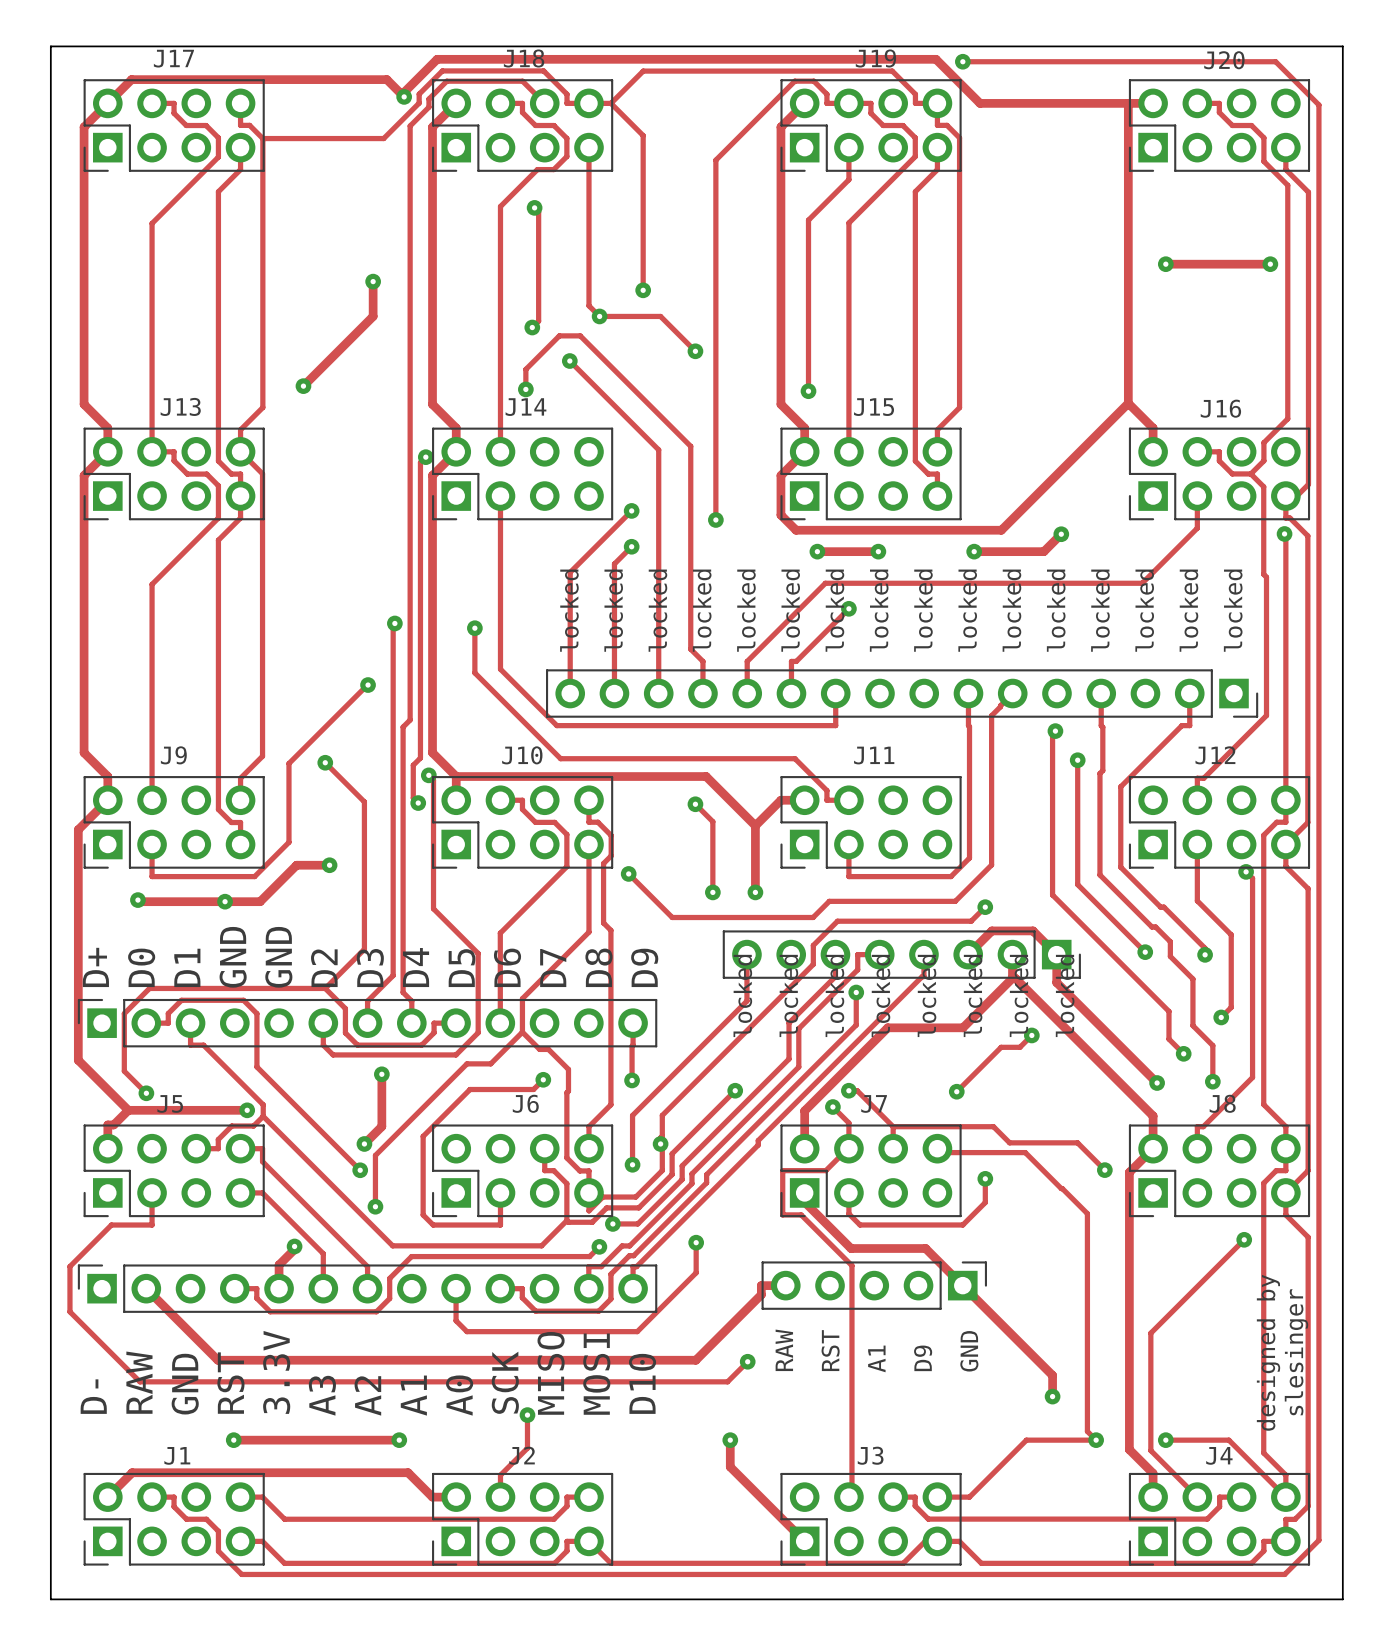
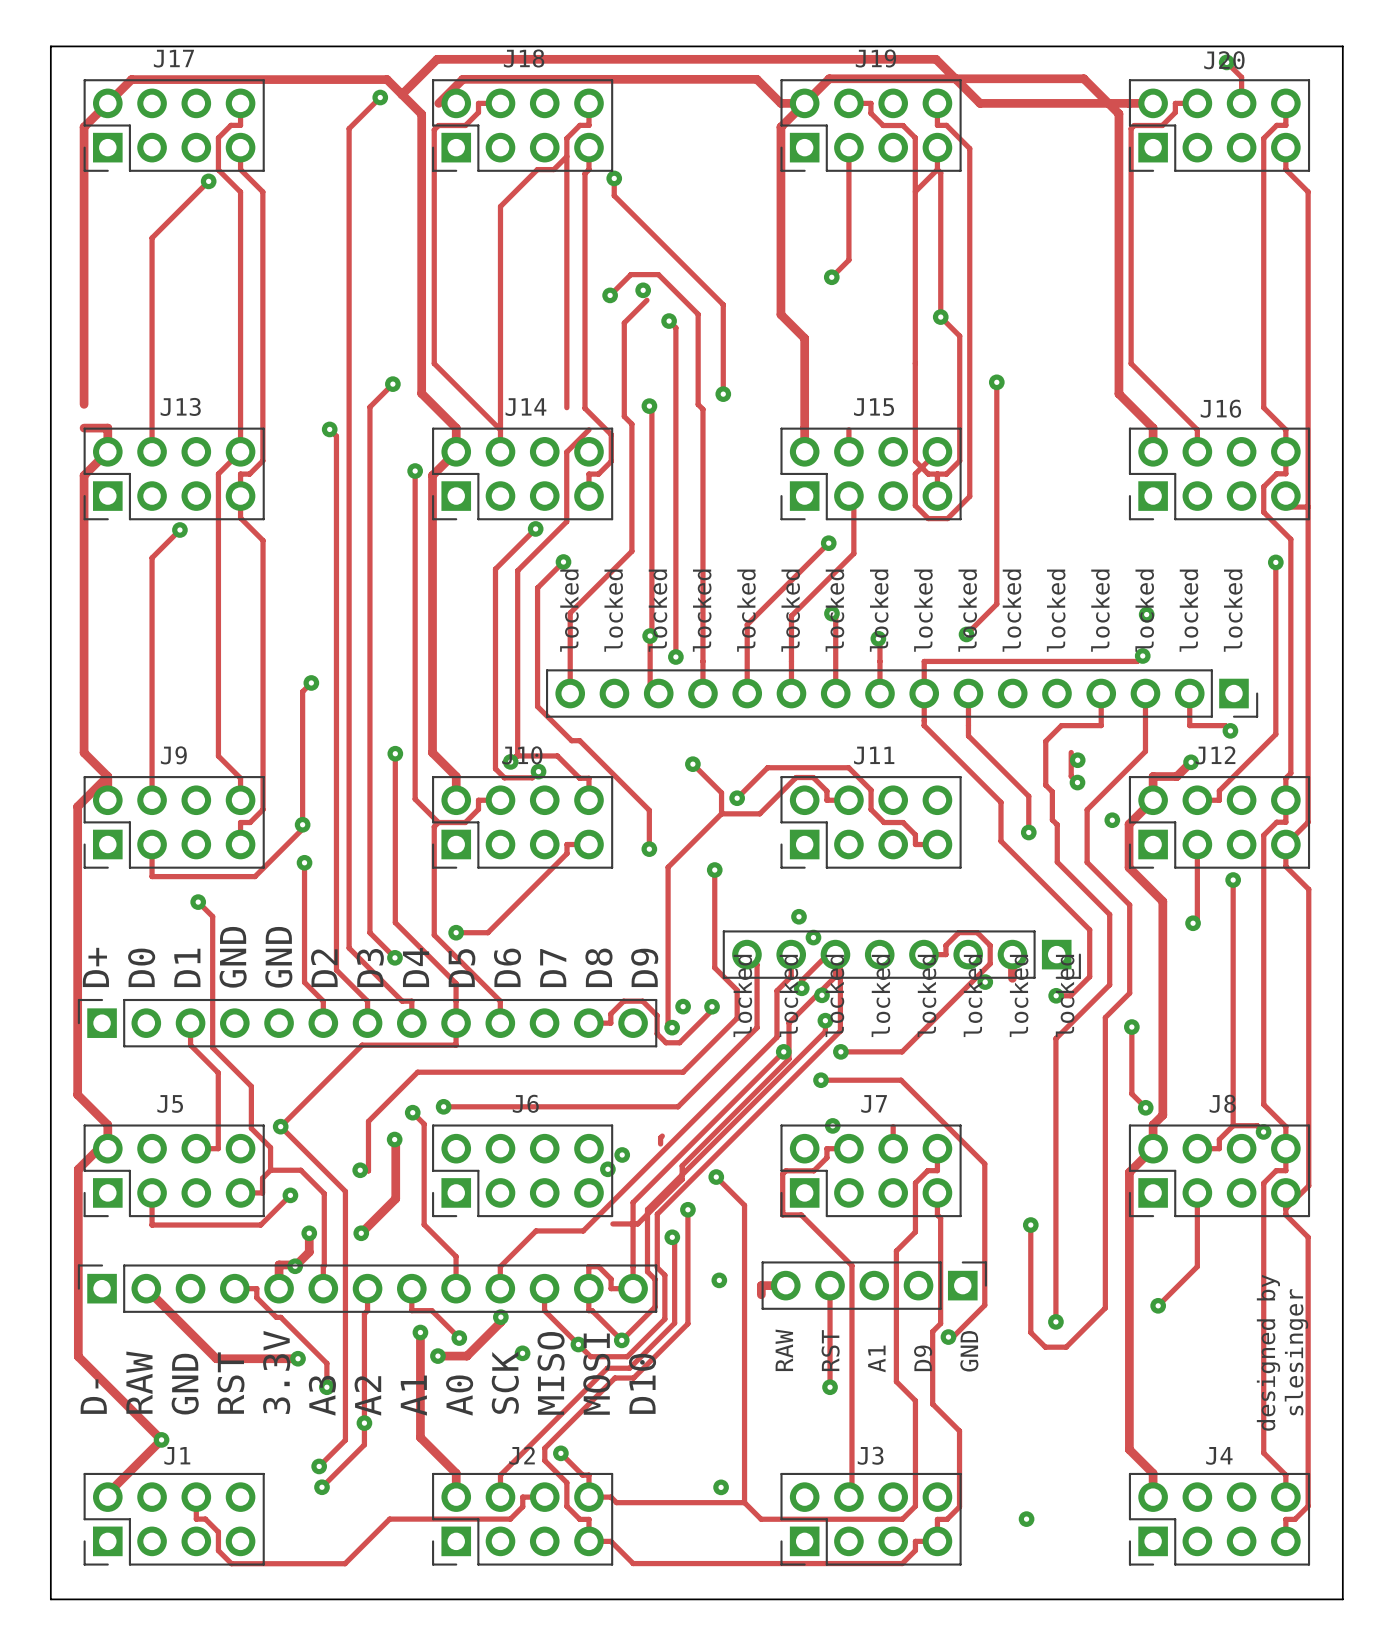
track: (962, 61) (1275, 61) (1318, 104) (1318, 1540) (1284, 1574) (241, 1574) (218, 1550) -> (544, 1497) (522, 1497) (522, 1506) (510, 1519) (389, 1519) (345, 1563) (231, 1563) (218, 1550)
via: (962, 61) -> none
track: none -> (1226, 62) (1241, 77) (1241, 103)
via: none -> (1226, 62)
track: (131, 79) (386, 79) (404, 96) -> (131, 79) (387, 79) (421, 114) (421, 393) (432, 404)
via position: (404, 96) -> (380, 97)
track: (152, 103) (174, 103) (174, 113) (186, 125) (206, 125) (218, 137) -> none
track: none -> (438, 103) (462, 79) (756, 79) (780, 103) (804, 103) (829, 78) (1083, 78) (1118, 113) (1118, 393) (1128, 403)
track: (456, 103) (432, 127) (432, 404) -> none
track: (500, 103) (522, 103) (522, 112) (535, 125) (553, 125) (566, 138) -> (588, 103) (588, 125) (579, 125) (566, 138)
track: none -> (500, 103) (478, 103) (478, 112) (465, 125) (438, 125) (434, 129) (434, 363) (500, 429)
track: (544, 103) (522, 81) (446, 81) (428, 99) (428, 107) (410, 126) (410, 720) (403, 727) (403, 992) (411, 1001) -> (380, 97) (349, 128) (349, 948) (402, 1001) (411, 1001)
track: (610, 103) (567, 103) (567, 94) (543, 70) (442, 70) (419, 94) (419, 103) (383, 138) (262, 138) -> none
track: (610, 103) (643, 135) (643, 290) -> none
track: (610, 103) (643, 71) (892, 71) (915, 94) (915, 103) (937, 103) -> none
track: (848, 103) (826, 103) (826, 94) (813, 81) (794, 81) (715, 160) (715, 519) -> none
track: (1128, 103) (1128, 403) (1001, 530) (796, 530) (780, 515) (780, 475) (804, 451) -> none
track: (1197, 103) (1219, 103) (1219, 112) (1232, 125) (1251, 125) (1263, 137) (1263, 161) (1287, 185) (1287, 418) (1263, 442) (1263, 460) (1250, 473) -> (1197, 103) (1175, 103) (1175, 112) (1162, 125) (1134, 125) (1131, 128) (1131, 363) (1197, 429) (1197, 451)
track: (240, 125) (249, 125) (262, 138) -> (240, 125) (230, 125) (218, 137)
track: (946, 125) (959, 137) (959, 407) (937, 429) (937, 451) -> (946, 125) (969, 148) (969, 496) (947, 518) (928, 518) (915, 505) (915, 473) (937, 451)
track: (262, 138) (262, 191) -> (240, 169) (262, 191)
track: (915, 156) (848, 222) -> (848, 179) (848, 222)
track: (218, 157) (152, 223) (152, 237) -> (208, 181) (152, 237)
track: none -> (218, 157) (218, 169) (240, 192) (240, 429)
track: (240, 169) (218, 191) (218, 461) (231, 474) (240, 474) -> none
track: (588, 169) (588, 305) (599, 316) (660, 316) (695, 351) -> (588, 169) (584, 173) (584, 408) (611, 434) (611, 461) (598, 474) (588, 474) (588, 496)
track: none -> (937, 169) (940, 172) (940, 317) (959, 336) (959, 460) (946, 474) (937, 474)
track: none -> (614, 178) (614, 195) (723, 304) (723, 394)
via: none -> (614, 178)
track: (848, 179) (808, 220) (808, 391) -> none
via: none -> (208, 181)
track: (1308, 191) (1308, 484) (1285, 507) (1285, 518) (1289, 518) (1307, 535) (1307, 822) -> (1308, 191) (1307, 822)
track: (534, 207) (538, 211) (538, 321) (532, 327) -> none
via: (534, 207) -> none
track: (848, 260) (848, 429) -> (848, 260) (831, 277)
track: (1165, 264) (1270, 264) -> none
via: (1165, 264) -> none
via: (1270, 264) -> none
via: none -> (831, 277)
track: (373, 281) (373, 316) (303, 386) -> none
via: (373, 281) -> none
track: (780, 314) (780, 404) (804, 428) -> (780, 314) (804, 338) (804, 428)
via position: (599, 316) -> (610, 295)
via: none -> (940, 317)
track: none -> (669, 321) (675, 327) (675, 657)
via: none -> (669, 321)
via: (532, 327) -> none
via: (695, 351) -> none
track: (569, 361) (658, 449) (658, 693) -> (649, 406) (651, 408) (650, 684) (658, 693)
via: (569, 361) -> none
track: none -> (996, 382) (996, 604) (966, 634)
via: none -> (996, 382)
track: none -> (392, 384) (369, 407) (369, 932) (394, 957)
via: none -> (392, 384)
via: (303, 386) -> none
track: (525, 389) (525, 369) (559, 335) (580, 335) (690, 446) (690, 649) (702, 661) -> (610, 295) (630, 274) (658, 274) (698, 314) (698, 404) (702, 409) (702, 661)
via: (525, 389) -> none
via: (808, 391) -> none
via: none -> (723, 394)
track: (84, 404) (107, 428) -> (84, 428) (107, 428)
via: none -> (649, 406)
track: (262, 407) (240, 429) -> (262, 407) (262, 460) (249, 474) (240, 474)
via: none -> (329, 429)
track: none -> (588, 429) (566, 452) (566, 521) (517, 570) (517, 755)
track: (152, 451) (174, 451) (174, 460) (187, 474) (206, 474) (218, 485) -> (240, 451) (218, 473) (218, 485)
track: (240, 451) (262, 473) (262, 756) (240, 778) -> none
track: (1197, 451) (1219, 451) (1219, 460) (1232, 473) (1250, 473) -> none
track: (425, 457) (420, 462) (420, 758) (413, 765) (413, 798) (418, 803) -> none
via position: (425, 457) -> (415, 471)
track: none -> (415, 471) (415, 799) (438, 822)
track: (1250, 473) (1263, 486) -> (1285, 103) (1285, 125) (1276, 125) (1263, 138) (1263, 407) (1285, 429) (1285, 473) (1276, 473) (1263, 486)
track: (500, 496) (500, 669) (556, 725) (835, 725) (835, 693) -> (831, 613) (835, 617) (835, 693)
track: (1197, 496) (1197, 528) (1142, 583) (825, 583) (747, 661) -> (828, 543) (747, 624) (747, 661)
track: none -> (1285, 507) (1308, 507)
track: (631, 510) (570, 572) (570, 613) -> (646, 300) (624, 322) (624, 416) (631, 424) (631, 551) (570, 613)
via: (631, 510) -> none
track: (1263, 512) (1263, 574) (1266, 577) (1266, 715) (1203, 778) (1197, 778) (1197, 800) -> (1275, 562) (1275, 734) (1219, 790) (1219, 800) (1197, 800)
track: (218, 518) (152, 584) -> (179, 530) (152, 557) (152, 584)
track: (240, 518) (218, 540) -> (218, 518) (218, 540)
track: none -> (240, 518) (263, 540) (263, 809) (250, 822) (240, 822)
via: (715, 519) -> none
track: none -> (535, 528) (495, 569) (495, 768) (504, 777) (532, 777) (538, 771)
via: none -> (535, 528)
via: none -> (179, 530)
track: (1284, 533) (1285, 778) -> (1263, 512) (1290, 539) (1290, 773) (1285, 778)
via position: (1284, 533) -> (1275, 562)
track: (1061, 534) (1043, 551) (974, 551) -> none
via: (1061, 534) -> none
track: (631, 546) (614, 563) (614, 693) -> none
via: (631, 546) -> none
track: (817, 551) (878, 551) -> none
via position: (817, 551) -> (828, 543)
via: (878, 551) -> none
via: (974, 551) -> none
track: none -> (563, 562) (537, 587) (537, 706) (571, 740) (579, 740) (649, 810) (649, 849)
via: none -> (563, 562)
track: (848, 608) (796, 661) (791, 661) -> (848, 496) (853, 501) (853, 553) (791, 615) (791, 661)
via position: (848, 608) -> (831, 613)
via: none -> (1146, 614)
track: (394, 623) (393, 625) (393, 975) (367, 1001) -> (329, 429) (336, 436) (336, 970) (367, 1001)
via: (394, 623) -> none
track: (474, 628) (474, 672) (560, 758) (795, 758) (826, 791) -> (721, 813) (759, 813) (796, 777) (813, 777) (826, 791)
via: (474, 628) -> none
via: none -> (966, 634)
via: none -> (650, 636)
track: none -> (878, 638) (879, 640) (879, 693)
via: none -> (878, 638)
track: none -> (1142, 655) (1137, 661) (924, 661) (924, 725) (1000, 802) (1000, 841) (1089, 929) (1089, 976) (1070, 995) (1056, 995)
via: none -> (1142, 655)
via: none -> (675, 657)
via: none -> (311, 682)
track: (368, 685) (288, 763) (288, 842) (254, 876) -> (311, 682) (302, 691) (302, 829) (255, 876)
via: (368, 685) -> none
track: (1012, 693) (991, 715) (991, 865) (955, 901) (829, 901) (813, 917) (672, 917) (628, 873) -> none
track: none -> (1145, 693) (1145, 751) (1087, 809) (1087, 862) (1129, 904) (1129, 993) (1105, 1017) (1105, 1308) (1066, 1347) (1045, 1347) (1030, 1332) (1030, 1225)
track: (968, 725) (969, 858) (951, 876) (848, 876) (848, 844) -> (968, 725) (968, 736) (1028, 796) (1028, 832)
track: (1101, 725) (1102, 727) (1102, 770) (1099, 773) (1099, 875) (1151, 927) (1155, 927) (1170, 941) (1170, 956) (1192, 979) (1192, 1025) (1212, 1045) (1212, 1081) -> (1101, 725) (1061, 725) (1045, 741) (1045, 785) (1052, 791) (1052, 819) (1057, 824) (1057, 862) (1109, 914) (1109, 984) (1055, 1038) (1055, 1321)
track: (1189, 725) (1181, 725) (1120, 786) (1120, 867) (1205, 948) (1205, 954) -> (1189, 725) (1225, 725) (1230, 730)
via: none -> (1230, 730)
track: (1055, 731) (1052, 733) (1052, 895) (1168, 1011) (1168, 1039) (1183, 1053) -> none
via: (1055, 731) -> none
track: none -> (1071, 752) (1071, 776) (1077, 782)
via: none -> (395, 753)
track: (218, 756) (218, 809) (231, 822) (240, 822) -> (218, 756) (240, 778)
track: (1077, 760) (1077, 884) (1145, 952) -> none
via: none -> (510, 761)
track: (325, 762) (364, 801) (364, 949) (325, 988) -> none
via: (325, 762) -> none
via: none -> (1191, 762)
track: none -> (692, 764) (721, 792) (721, 813)
via: none -> (692, 764)
via: none -> (538, 771)
track: (428, 775) (433, 780) (433, 908) (478, 953) (478, 1032) (456, 1054) (333, 1054) (323, 1045) (323, 1023) -> (304, 862) (304, 982) (323, 1001) (323, 1023)
via: (428, 775) -> none
track: (456, 776) (706, 776) (755, 825) -> none
via: none -> (1077, 782)
track: none -> (737, 798) (767, 767) (848, 767) (871, 790) (871, 809) (884, 822) (903, 822) (915, 834) (915, 844) (937, 844)
via: none -> (737, 798)
track: (107, 800) (78, 829) (78, 1060) (128, 1110) -> none
track: (500, 800) (522, 800) (522, 809) (535, 822) (554, 822) (566, 834) (566, 866) (500, 933) (500, 1001) -> (438, 822) (434, 826) (434, 935) (500, 1001)
track: none -> (500, 800) (478, 800) (478, 809) (465, 822) (438, 822)
track: (588, 800) (588, 822) (597, 822) (611, 835) (611, 855) (603, 863) (603, 923) (610, 930) (610, 1104) (588, 1126) (588, 1148) -> (588, 800) (588, 778) (579, 778) (557, 755) (516, 755) (510, 761)
track: (804, 800) (780, 800) (755, 825) -> none
via: (418, 803) -> none
track: (695, 804) (712, 821) (712, 892) -> none
via: (695, 804) -> none
track: none -> (721, 813) (668, 867) (668, 1023) (672, 1027)
via: none -> (1112, 820)
via: none -> (302, 824)
track: (755, 825) (755, 892) -> none
via: none -> (1028, 832)
track: (588, 844) (588, 932) (522, 998) (522, 1032) -> (588, 844) (567, 844) (567, 853) (487, 932) (456, 932)
via: none -> (649, 849)
via: none -> (304, 862)
track: (329, 865) (296, 865) (260, 901) (139, 901) (137, 900) (139, 900) -> none
via: (329, 865) -> none
track: none -> (714, 870) (714, 967) (737, 990) (737, 1018) (683, 1072) (417, 1072) (368, 1121) (368, 1170)
track: (1246, 871) (1252, 878) (1252, 1077) (1203, 1126) (1197, 1126) (1197, 1148) -> (1233, 1125) (1219, 1139) (1219, 1148) (1197, 1148)
via position: (1246, 871) -> (1233, 880)
via: (628, 873) -> none
track: none -> (1233, 880) (1233, 1125)
track: (1308, 888) (1308, 1170) (1285, 1192) -> (1308, 888) (1308, 1185) (1285, 1208)
via position: (712, 892) -> (714, 870)
via: (755, 892) -> none
via: (137, 900) -> none
track: (1197, 900) (1231, 934) (1231, 1007) (1221, 1017) -> (1197, 900) (1197, 918) (1193, 923)
via position: (225, 901) -> (198, 902)
track: none -> (198, 902) (212, 916) (212, 1047) (251, 1086) (251, 1128) (270, 1147) (270, 1170)
track: (985, 907) (971, 921) (837, 921) (813, 945) (813, 964) (662, 1115) (662, 1170) (635, 1197) (602, 1197) (588, 1210) (588, 1170) (579, 1170) (566, 1157) (568, 1069) (548, 1049) (539, 1049) (522, 1032) -> none
via: (985, 907) -> none
via: none -> (798, 916)
via: none -> (1193, 923)
via: none -> (456, 932)
via: none -> (813, 937)
via: (1145, 952) -> none
track: (746, 954) (746, 1001) (632, 1115) (632, 1164) -> (746, 954) (757, 964) (757, 1027) (678, 1106) (443, 1106)
track: none -> (827, 954) (801, 980) (801, 988)
track: none -> (834, 954) (840, 960) (840, 1031) (657, 1214) (657, 1267) (664, 1275) (664, 1319) (627, 1356) (590, 1356) (544, 1310) (544, 1288)
track: (879, 954) (857, 954) (857, 969) (798, 1028) (798, 1067) (691, 1173) (691, 1183) (629, 1245) (622, 1245) (601, 1266) (598, 1266) -> (633, 1288) (611, 1288) (611, 1279) (598, 1266)
track: (923, 954) (923, 976) (758, 1140) (758, 1145) (636, 1266) (633, 1266) -> (783, 1051) (633, 1202) (633, 1266)
track: none -> (923, 954) (945, 954) (945, 945) (958, 932) (977, 932) (990, 945) (990, 963) (902, 1051) (840, 1051)
track: (968, 954) (991, 930) (1033, 930) (1056, 954) (1056, 982) (1157, 1083) -> none
via: (1205, 954) -> none
via: none -> (394, 957)
via: none -> (985, 982)
track: (325, 988) (345, 1008) (345, 1032) (357, 1045) (362, 1045) -> (319, 1466) (345, 1440) (345, 1191) (280, 1126) (362, 1045)
track: (325, 988) (149, 988) (124, 1013) (124, 1071) (146, 1093) -> none
via: none -> (801, 988)
track: (856, 992) (856, 1025) (706, 1174) (706, 1182) (633, 1255) (629, 1255) (610, 1274) (610, 1299) (598, 1311) (535, 1311) (522, 1297) (522, 1288) (500, 1288) -> (791, 954) (791, 976) (776, 990) (776, 1037) (583, 1230) (536, 1230) (500, 1266) (500, 1288)
via: (856, 992) -> none
via: none -> (822, 995)
via: none -> (1056, 995)
via: none -> (683, 1006)
track: none -> (712, 1006) (712, 1010) (679, 1042) (666, 1042) (657, 1033) (657, 1015) (642, 1001) (623, 1001) (610, 1014) (610, 1023) (588, 1023)
via: none -> (712, 1006)
via: (1221, 1017) -> none
track: none -> (825, 1020) (825, 1031) (647, 1209) (647, 1271) (655, 1279) (655, 1307) (621, 1340) (592, 1310) (588, 1310) (588, 1288)
via: none -> (825, 1020)
track: (146, 1023) (168, 1023) (168, 1013) (181, 1000) (243, 1000) (256, 1013) (256, 1066) (360, 1170) -> none
track: (456, 1023) (434, 1023) (434, 1032) (421, 1045) -> (395, 753) (395, 922) (456, 983) (456, 1045) (421, 1045)
track: (633, 1023) (632, 1080) -> none
via: none -> (672, 1027)
track: none -> (1131, 1027) (1131, 1093) (1145, 1107)
via: none -> (1131, 1027)
track: (522, 1032) (490, 1063) (466, 1063) (375, 1155) (375, 1206) -> none
track: (1031, 1035) (1019, 1047) (1001, 1047) (956, 1091) -> none
via: (1031, 1035) -> none
track: (190, 1045) (203, 1045) (263, 1104) (263, 1116) -> (190, 1045) (218, 1072) (218, 1139)
via: none -> (783, 1051)
via: none -> (840, 1051)
via: (1183, 1053) -> none
track: (381, 1074) (381, 1126) (364, 1143) -> none
via: (381, 1074) -> none
track: (543, 1079) (533, 1089) (470, 1089) (423, 1136) (423, 1214) (433, 1225) (500, 1225) (500, 1192) -> none
via: (543, 1079) -> none
via: (632, 1080) -> none
track: none -> (821, 1080) (901, 1080) (984, 1163) (984, 1305) (953, 1337) (948, 1337)
via: none -> (821, 1080)
via: (1212, 1081) -> none
via position: (1157, 1083) -> (1145, 1107)
track: (735, 1090) (672, 1153) (672, 1174) (638, 1207) (606, 1207) (592, 1222) (568, 1222) (566, 1220) -> none
via: (735, 1090) -> none
track: (848, 1090) (857, 1090) (893, 1126) (993, 1126) (1009, 1142) (1077, 1142) (1104, 1170) -> none
via: (848, 1090) -> none
via: (956, 1091) -> none
via: (146, 1093) -> none
via: none -> (443, 1106)
track: (832, 1107) (848, 1123) (848, 1148) -> none
via: (832, 1107) -> none
track: (128, 1110) (113, 1124) (107, 1124) -> (107, 776) (77, 806) (77, 1094) (107, 1124)
track: (128, 1110) (247, 1110) -> none
via position: (247, 1110) -> (280, 1126)
via: none -> (412, 1112)
track: (263, 1116) (392, 1245) (541, 1245) (566, 1220) -> none
track: (263, 1116) (253, 1126) (231, 1126) (218, 1139) -> none
track: (1153, 1124) (1153, 1116) (1015, 978) (1012, 978) (962, 1027) (887, 1027) (804, 1110) (804, 1148) -> (1153, 1124) (1162, 1115) (1162, 901) (1129, 867) (1129, 824) (1153, 800) (1153, 776) (1176, 776) (1191, 762)
via: none -> (832, 1125)
track: none -> (1233, 1125) (1257, 1125) (1263, 1131)
via: none -> (1263, 1131)
track: none -> (107, 1139) (78, 1169) (78, 1356) (161, 1439) (107, 1493) (107, 1497)
track: none -> (394, 1139) (395, 1198) (361, 1233)
via: none -> (394, 1139)
via: (364, 1143) -> none
via: (660, 1143) -> none
track: (240, 1148) (262, 1148) (262, 1161) (367, 1266) (367, 1288) -> (322, 1487) (364, 1444) (364, 1313) (367, 1310) (367, 1288)
track: (544, 1148) (544, 1170) (553, 1170) (566, 1183) (566, 1220) -> none
track: (847, 1148) (825, 1170) (783, 1170) (782, 1173) -> (847, 1148) (826, 1148) (826, 1157) (813, 1170) (785, 1170) (782, 1173)
track: (937, 1148) (941, 1152) (1025, 1152) (1087, 1213) (1087, 1431) (1096, 1440) (1026, 1440) (969, 1497) (937, 1497) -> (937, 1148) (937, 1170) (927, 1170) (915, 1183) (915, 1231) (896, 1251) (896, 1381) (915, 1400) (915, 1506) (902, 1519) (761, 1519) (744, 1502)
via position: (632, 1164) -> (622, 1154)
via: none -> (607, 1169)
track: none -> (270, 1170) (262, 1178) (262, 1192)
via: (1104, 1170) -> none
track: none -> (716, 1177) (744, 1205) (744, 1502)
via: none -> (716, 1177)
track: (985, 1178) (985, 1202) (962, 1224) (860, 1224) (848, 1213) (848, 1192) -> none
via: (985, 1178) -> none
track: (262, 1192) (323, 1253) (323, 1266) -> (270, 1170) (300, 1170) (324, 1193) (323, 1266)
track: (804, 1192) (804, 1202) (851, 1248) (925, 1248) (1052, 1375) (1052, 1396) -> none
track: none -> (1197, 1192) (1197, 1266) (1158, 1305)
via: none -> (290, 1195)
via position: (375, 1206) -> (361, 1233)
via: none -> (687, 1209)
via: (612, 1223) -> none
track: (152, 1225) (111, 1225) (69, 1266) (69, 1311) (139, 1381) (727, 1381) (747, 1361) -> (152, 1225) (260, 1225) (290, 1195)
via: none -> (1030, 1225)
via: none -> (309, 1233)
via: none -> (672, 1237)
track: (1244, 1239) (1150, 1333) (1150, 1450) (1197, 1497) -> none
via: (1244, 1239) -> none
track: (696, 1242) (696, 1272) (637, 1331) (466, 1331) (456, 1320) (456, 1288) -> (412, 1112) (424, 1124) (424, 1224) (456, 1256) (456, 1288)
via: (696, 1242) -> none
track: (294, 1246) (294, 1249) (279, 1264) -> (309, 1233) (309, 1252) (295, 1266) (279, 1264)
via: (294, 1246) -> none
track: (599, 1246) (589, 1256) (411, 1256) (389, 1278) (389, 1298) (376, 1311) (270, 1311) (256, 1297) -> (326, 1387) (326, 1363) (280, 1317) (276, 1317) (256, 1297)
via: (599, 1246) -> none
via: none -> (295, 1266)
via: none -> (719, 1280)
track: none -> (830, 1285) (830, 1387)
track: none -> (411, 1288) (411, 1310) (431, 1310) (459, 1338)
track: (761, 1294) (695, 1360) (216, 1358) -> (298, 1358) (216, 1358)
via: none -> (1158, 1305)
track: none -> (500, 1317) (500, 1322) (466, 1356) (437, 1356)
via: none -> (500, 1317)
via: none -> (1055, 1321)
via: none -> (420, 1332)
via: none -> (948, 1337)
via: none -> (459, 1338)
via: none -> (621, 1340)
via: none -> (578, 1344)
via: none -> (522, 1353)
via: none -> (437, 1356)
via: none -> (298, 1358)
via: (747, 1361) -> none
via: none -> (326, 1387)
via: none -> (830, 1387)
via: (1052, 1396) -> none
track: (527, 1415) (527, 1448) -> (672, 1237) (674, 1239) (674, 1323) (629, 1368) (607, 1368) (527, 1448)
via: (527, 1415) -> none
via: none -> (161, 1439)
track: (233, 1440) (399, 1440) -> none
via: (233, 1440) -> none
via position: (399, 1440) -> (364, 1423)
track: (730, 1440) (730, 1466) (804, 1541) -> none
via position: (730, 1440) -> (721, 1487)
via: (1096, 1440) -> none
track: (1165, 1440) (1228, 1440) (1285, 1497) -> none
via: (1165, 1440) -> none
track: none -> (560, 1453) (582, 1475) (588, 1475) (588, 1497) (610, 1497) (616, 1502) (744, 1502)
via: none -> (560, 1453)
via: none -> (319, 1466)
via: none -> (322, 1487)
track: (107, 1497) (132, 1472) (408, 1472) (432, 1497) (456, 1497) -> (420, 1332) (420, 1437) (456, 1473) (456, 1497)
track: (152, 1497) (174, 1497) (174, 1506) (186, 1519) (206, 1519) (218, 1532) -> (196, 1497) (196, 1519) (205, 1519) (218, 1532)
track: (240, 1497) (262, 1497) (284, 1519) (553, 1519) (567, 1506) (567, 1497) (588, 1497) -> none
track: (893, 1497) (915, 1497) (915, 1505) (928, 1519) (1207, 1519) (1219, 1506) (1219, 1497) (1241, 1497) -> none
via: none -> (1026, 1519)
track: (240, 1541) (262, 1541) (284, 1563) (554, 1563) (567, 1550) (567, 1541) (588, 1541) (610, 1563) (903, 1563) (925, 1541) -> (687, 1209) (687, 1323) (633, 1378) (614, 1378) (544, 1448) (544, 1460) (566, 1482) (566, 1506) (579, 1519) (588, 1519) (588, 1541) (610, 1541) (633, 1563) (902, 1563) (915, 1550) (915, 1541) (925, 1541)
track: (937, 1541) (959, 1541) (981, 1563) (1251, 1563) (1263, 1550) (1263, 1541) (1285, 1541) -> (937, 1541) (937, 1519) (947, 1519) (959, 1506) (959, 1430) (932, 1404) (932, 1331) (940, 1323) (940, 1218) (937, 1214) (937, 1192)

